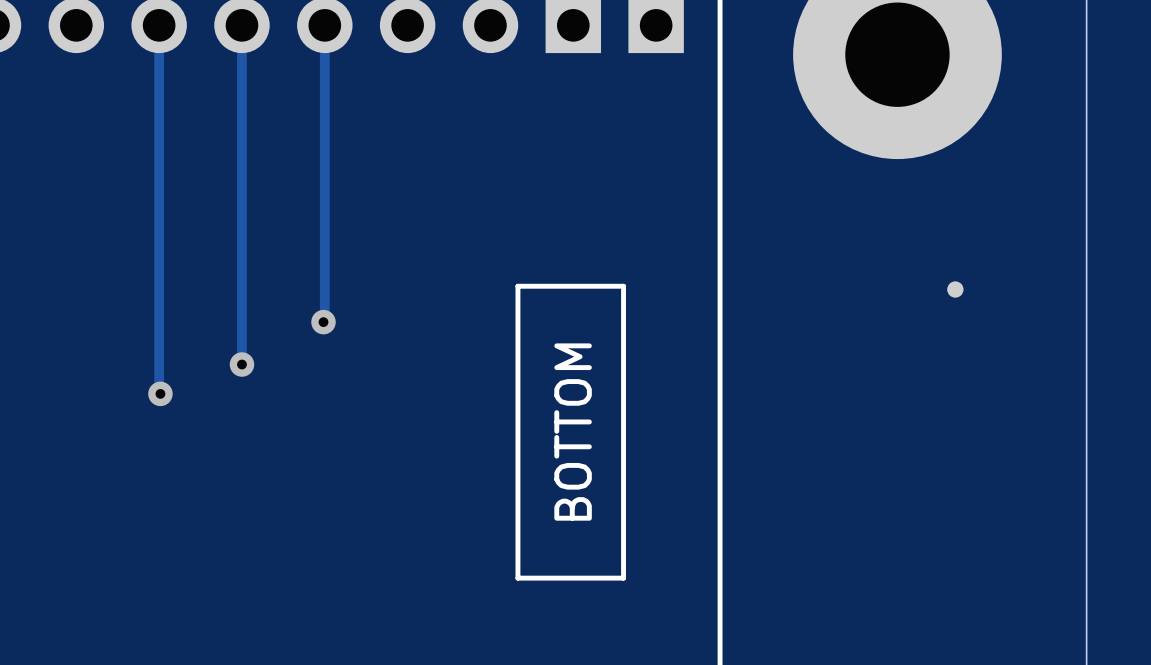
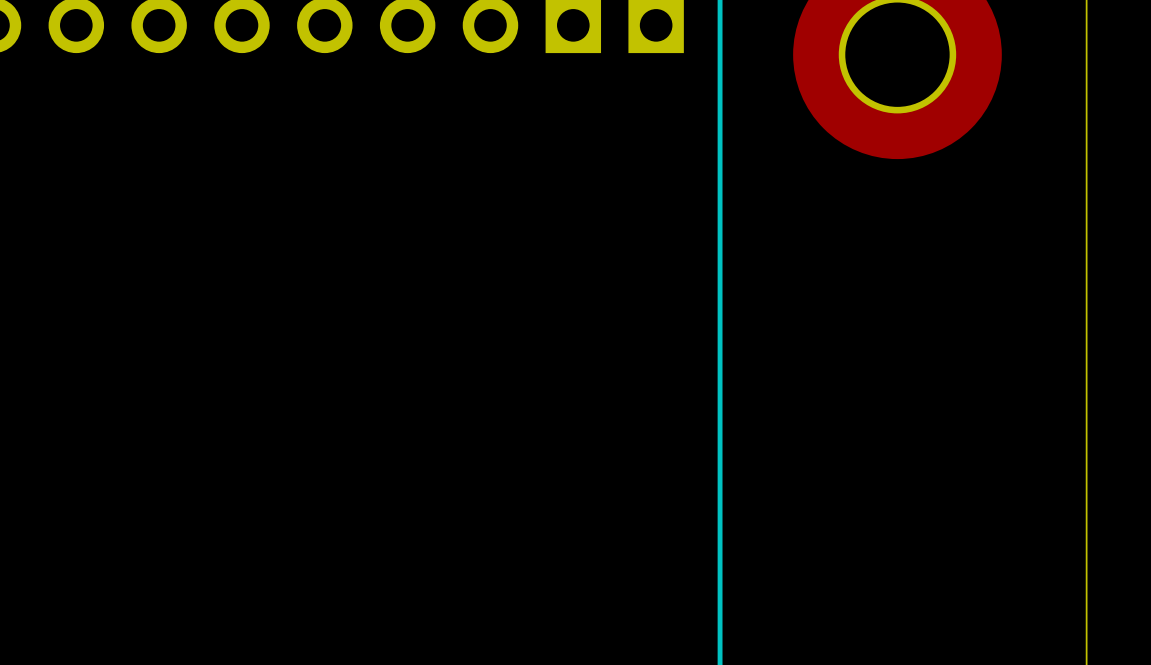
track: (159, 25) (160, 393) -> none
track: (241, 25) (241, 364) -> none
track: (324, 25) (323, 322) -> none
line: (517, 286) (623, 286) (623, 578) (517, 578) (517, 286) -> none
part: (955, 289) -> none
via: (323, 322) -> none
via: (241, 364) -> none
via: (160, 393) -> none
text: BOTTOM (573, 432) -> none

